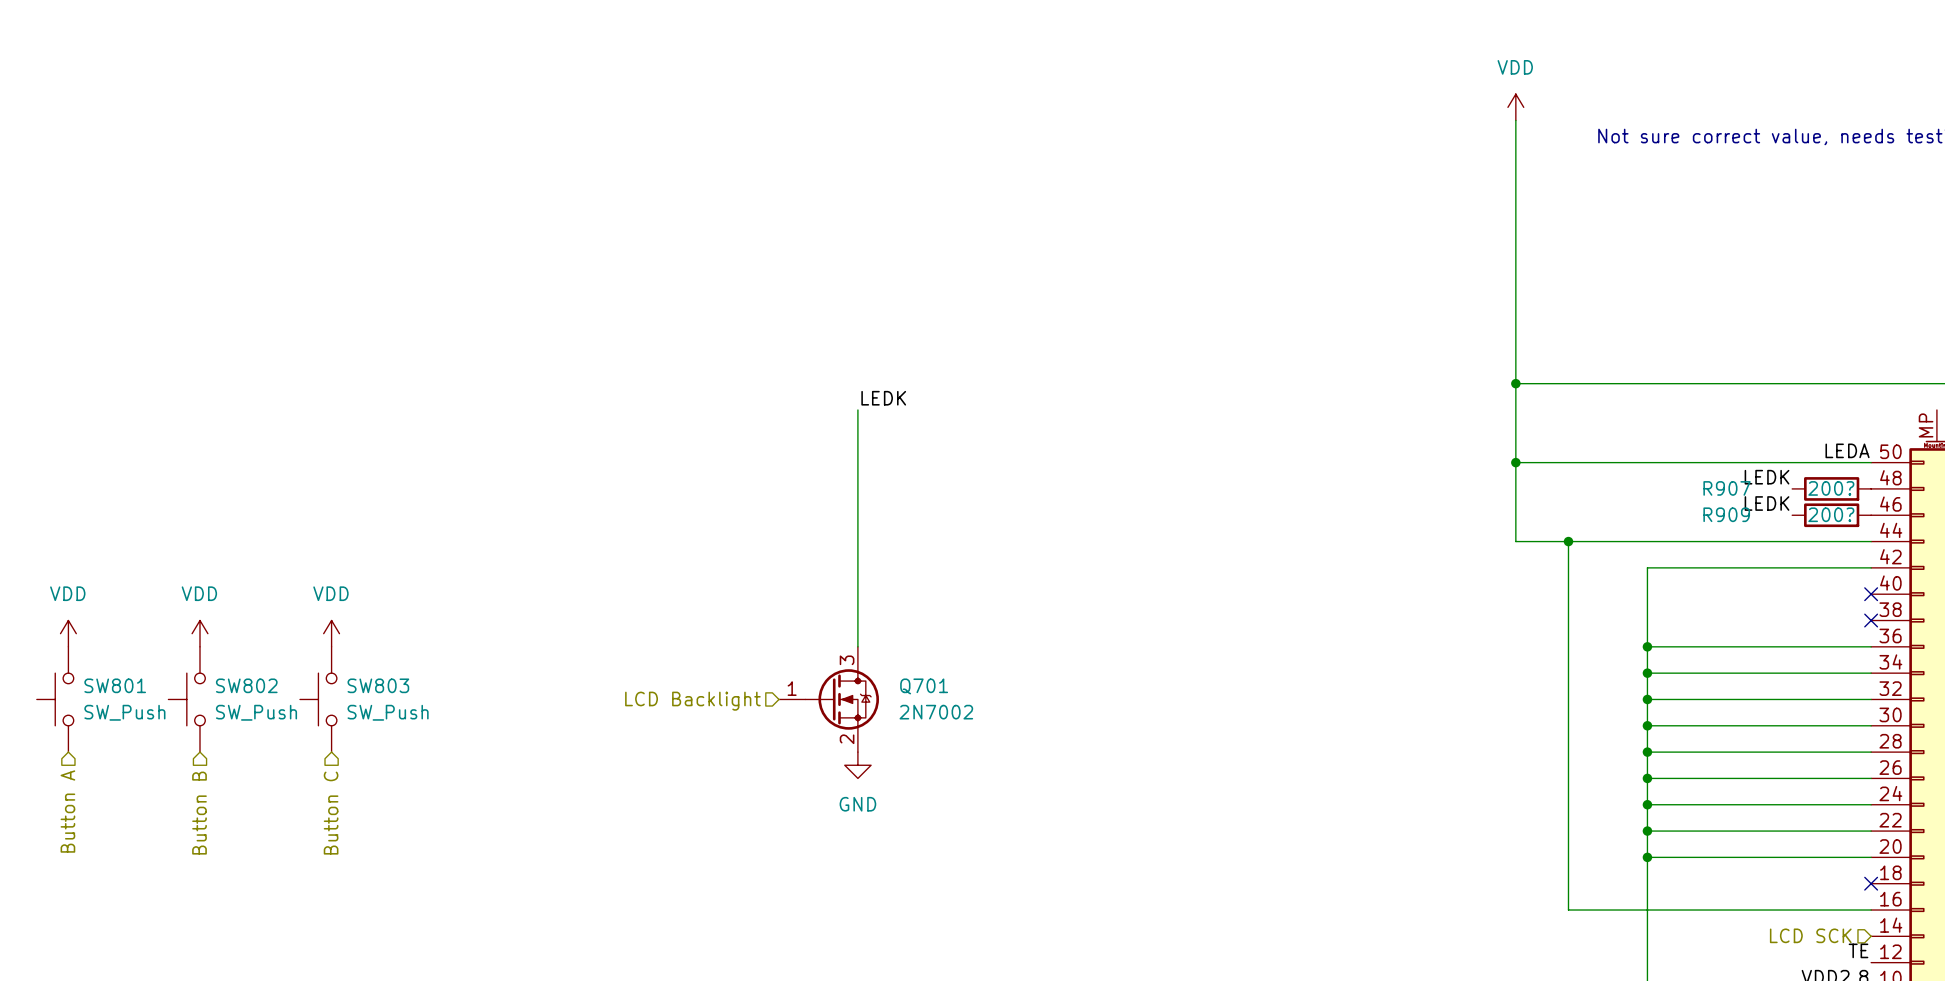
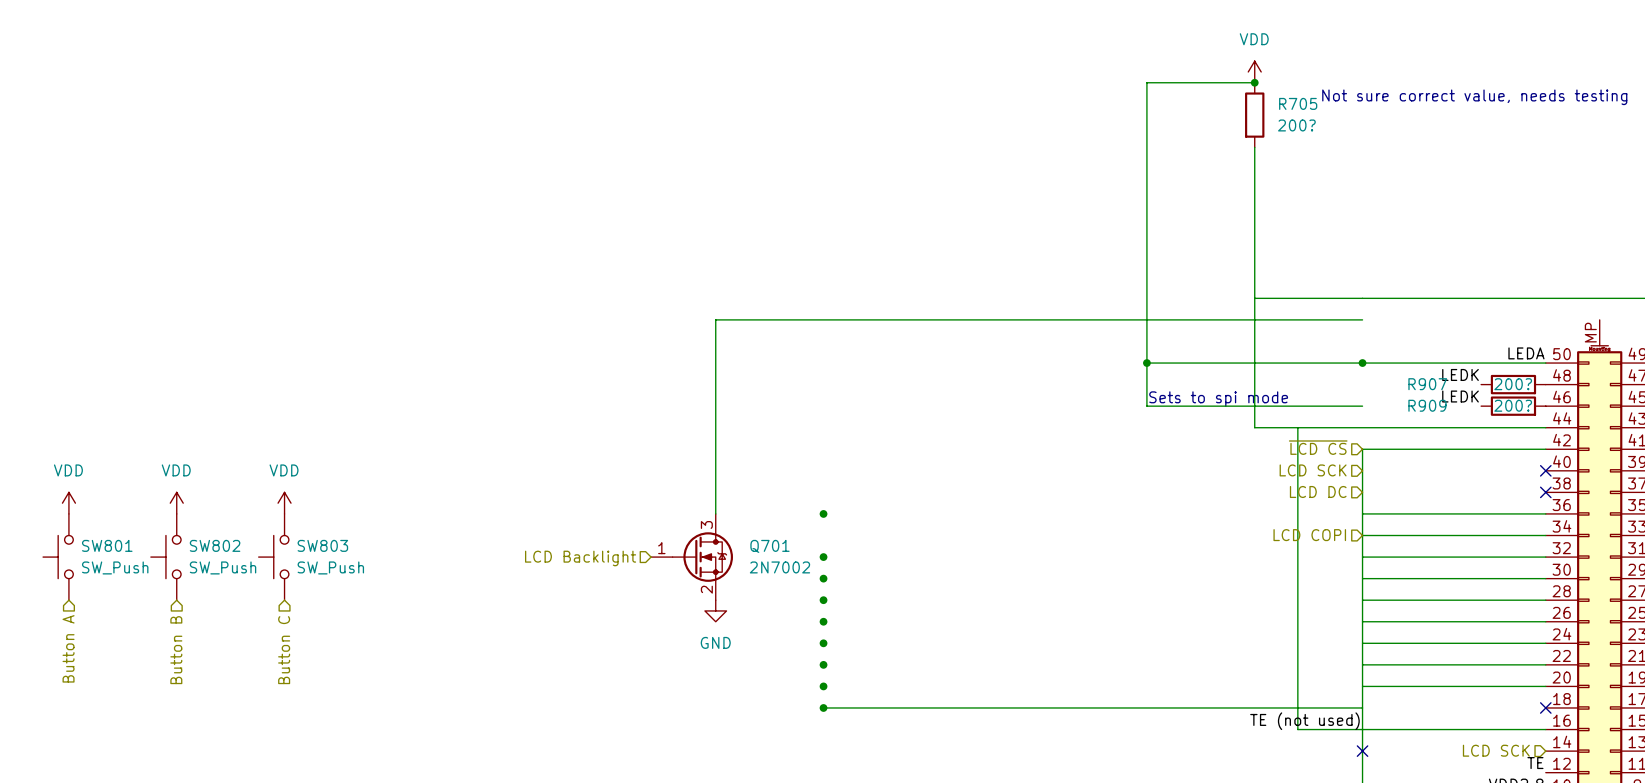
wire: (1515, 120) (1515, 199) -> (1254, 82) (1146, 82) (1146, 406) (1362, 406)
junction: none -> (1254, 82)
R705: none -> 200? (1254, 115)
junction: (1515, 383) -> none
label: LEDK (883, 398) -> none
wire: none -> (715, 319) (1362, 319)
wire: none -> (1146, 363) (1254, 363)
junction: none -> (1146, 363)
junction: (1515, 462) -> none
junction: none -> (1362, 363)
text: none -> Sets to spi mode (1218, 399)
junction: (1568, 541) -> none
hierarchical label: none -> ~{LCD CS} (1318, 447)
hierarchical label: none -> LCD SCK (1313, 470)
hierarchical label: none -> LCD DC (1318, 491)
junction: none -> (823, 513)
junction: (1647, 646) -> none
hierarchical label: none -> LCD COPI (1309, 535)
junction: (1647, 673) -> none
junction: none -> (823, 557)
junction: (1647, 699) -> none
junction: none -> (823, 578)
junction: (1647, 725) -> none
junction: none -> (823, 600)
junction: (1647, 752) -> none
junction: none -> (823, 621)
junction: (1647, 778) -> none
junction: none -> (823, 643)
junction: (1647, 804) -> none
junction: none -> (823, 664)
junction: (1647, 831) -> none
junction: none -> (823, 686)
junction: (1647, 857) -> none
wire: none -> (823, 707) (1362, 707)
junction: none -> (823, 707)
label: none -> TE (not used) (1304, 721)
no-connect mark: none -> (1362, 751)

